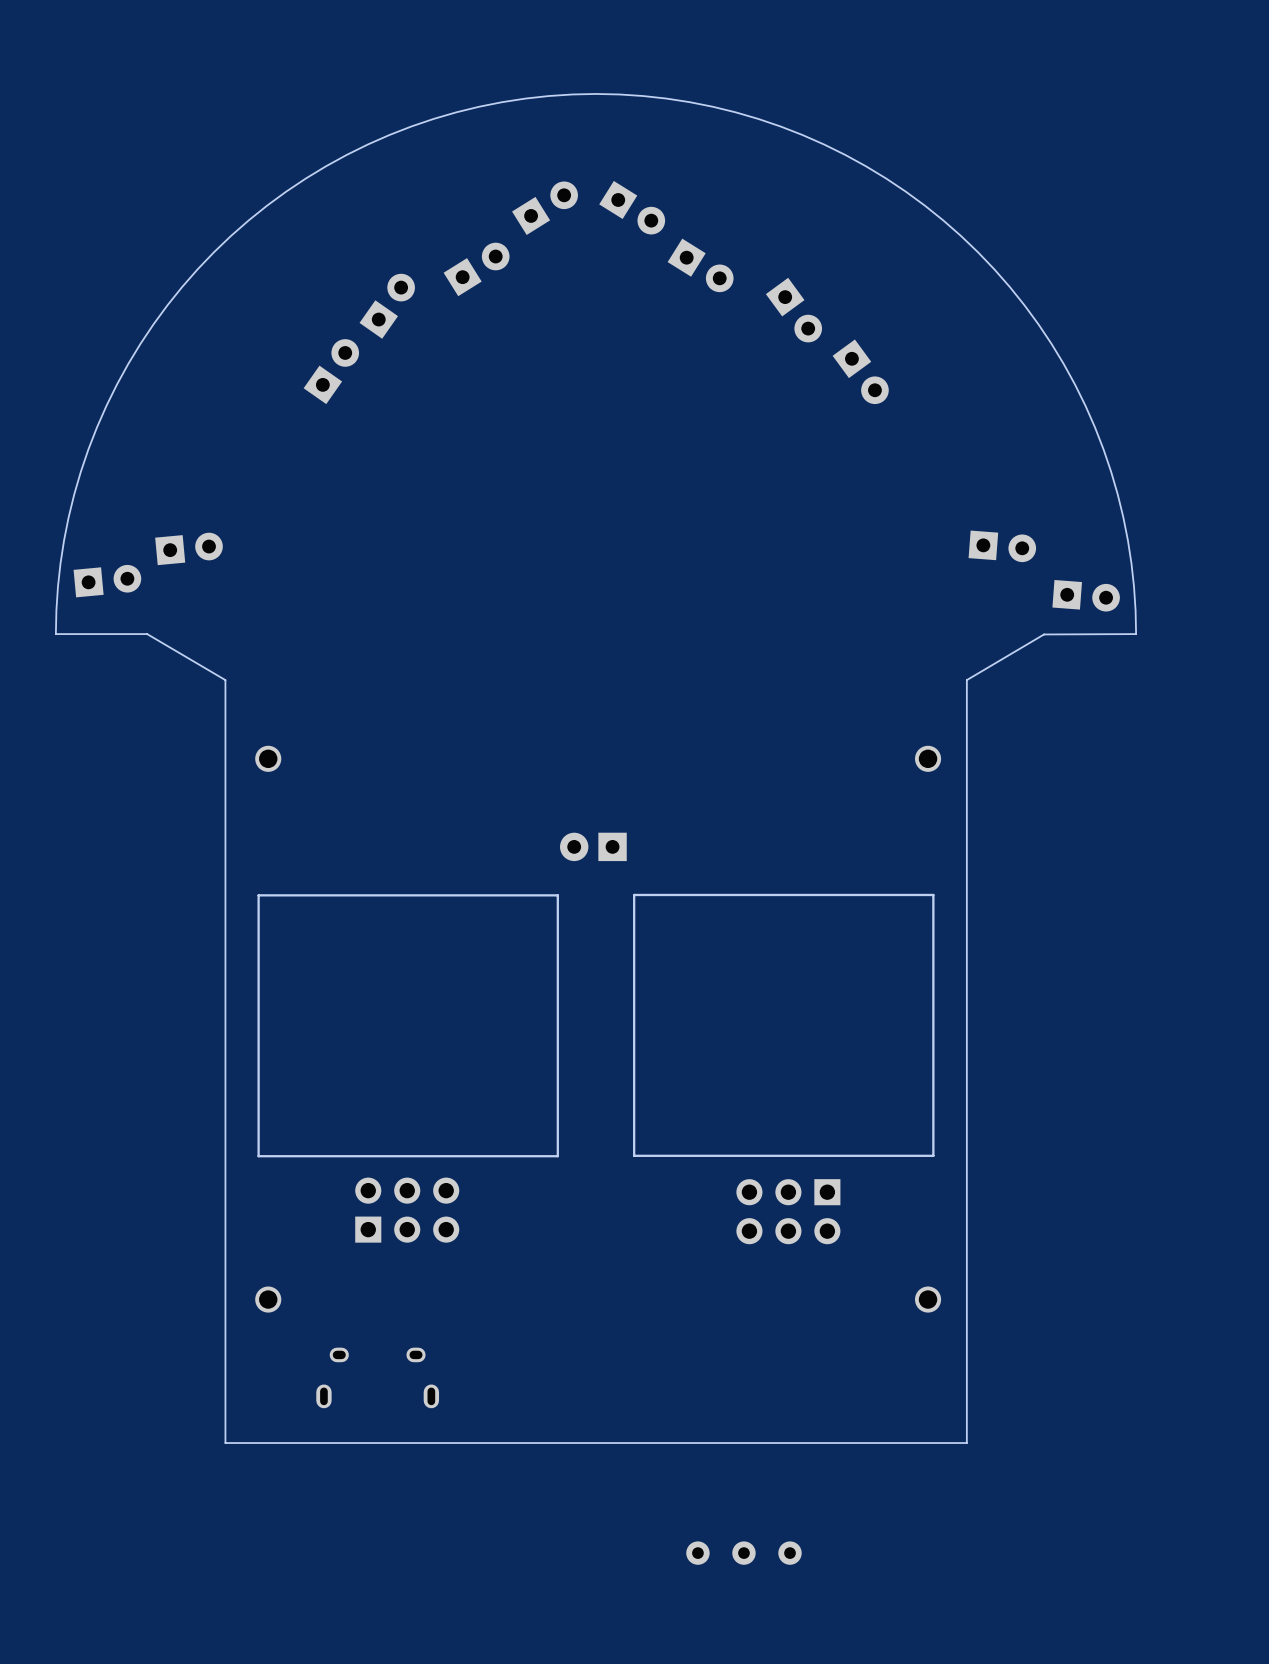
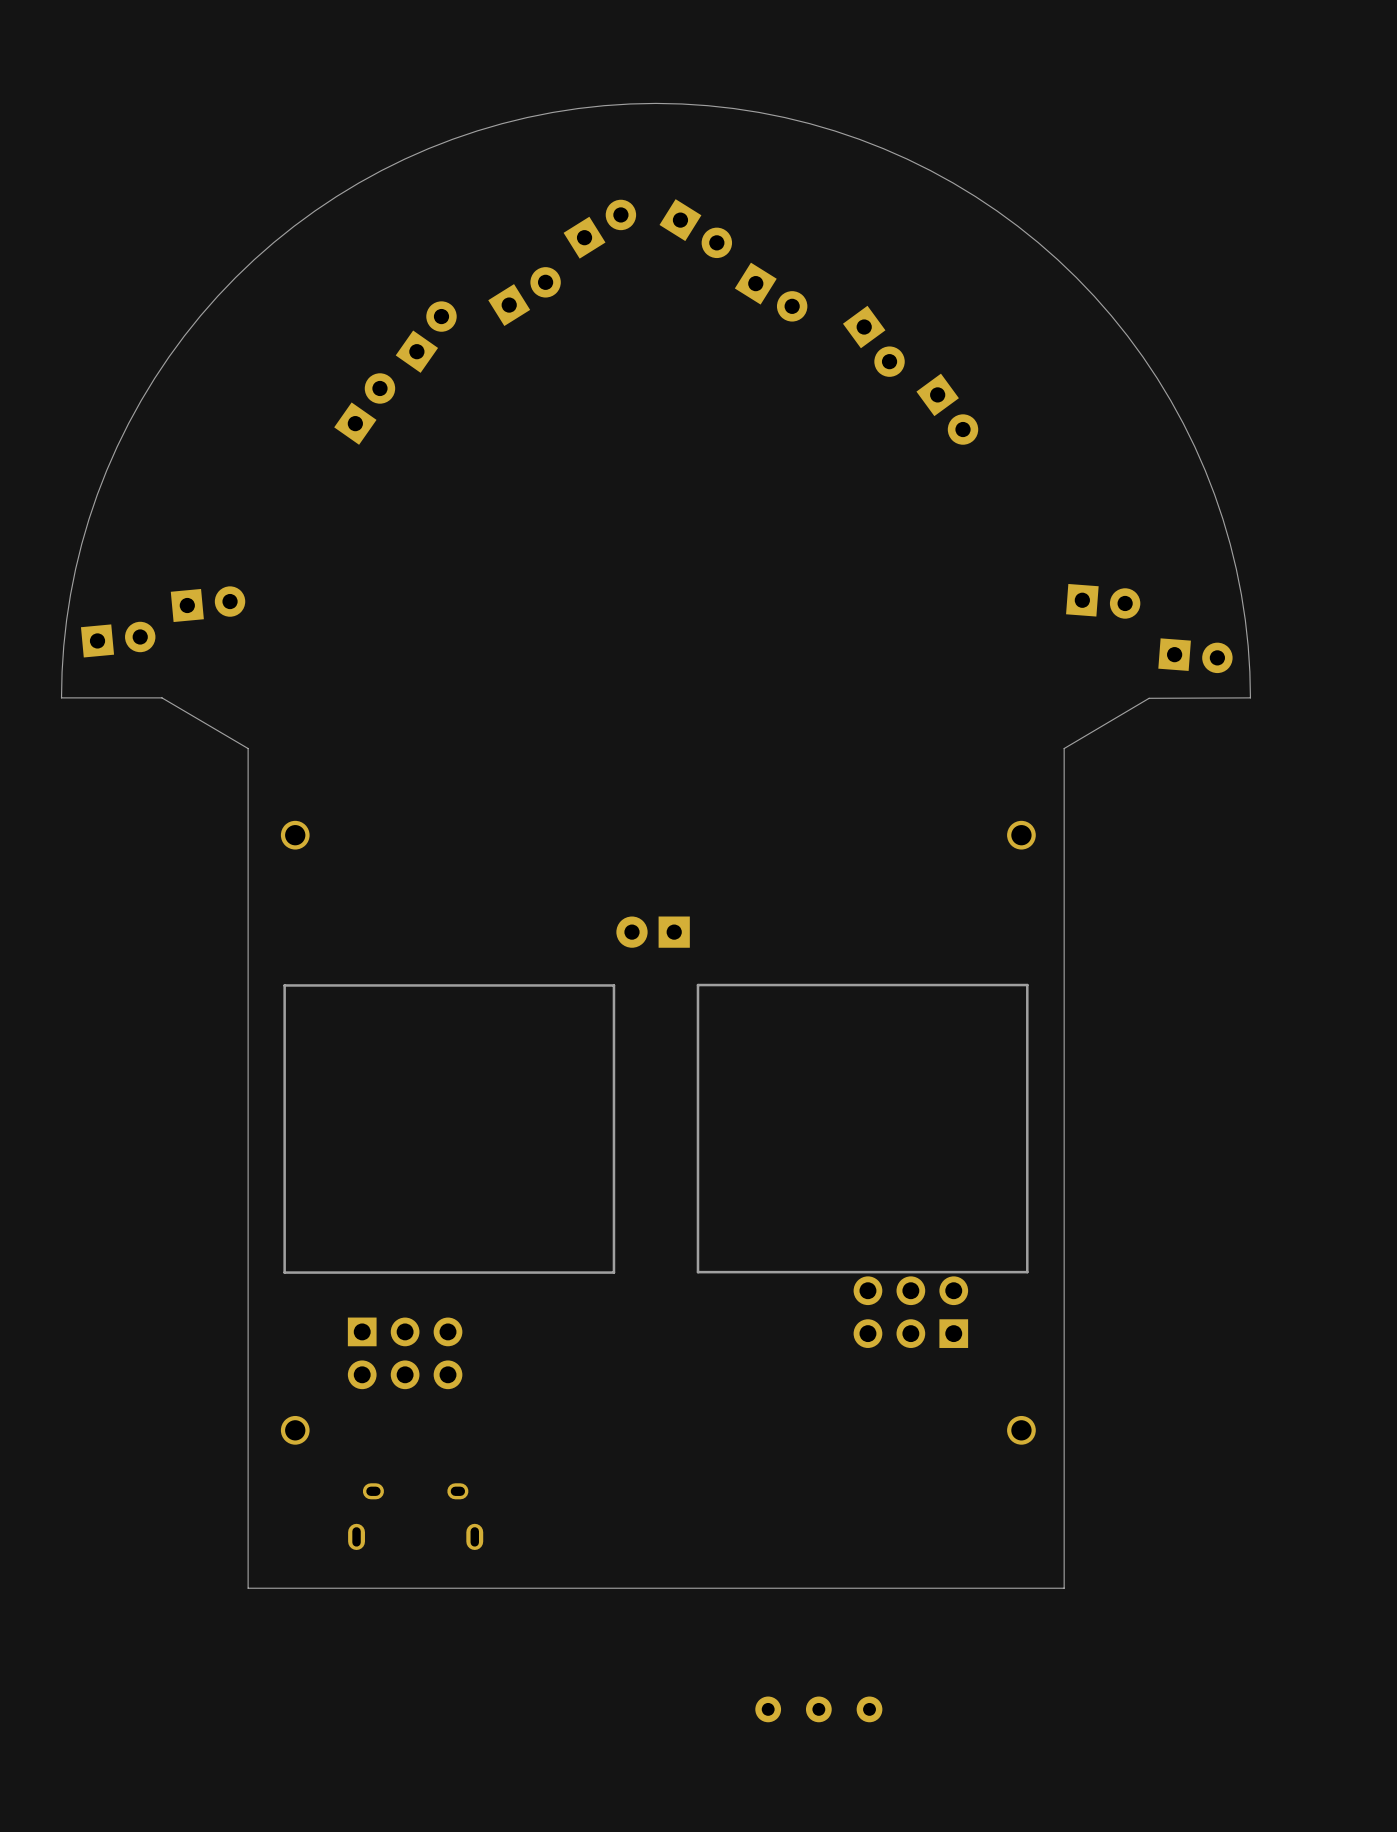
part: none -> (910, 1312)
part: (407, 1210) -> none
part: (788, 1211) -> none
part: none -> (405, 1353)

